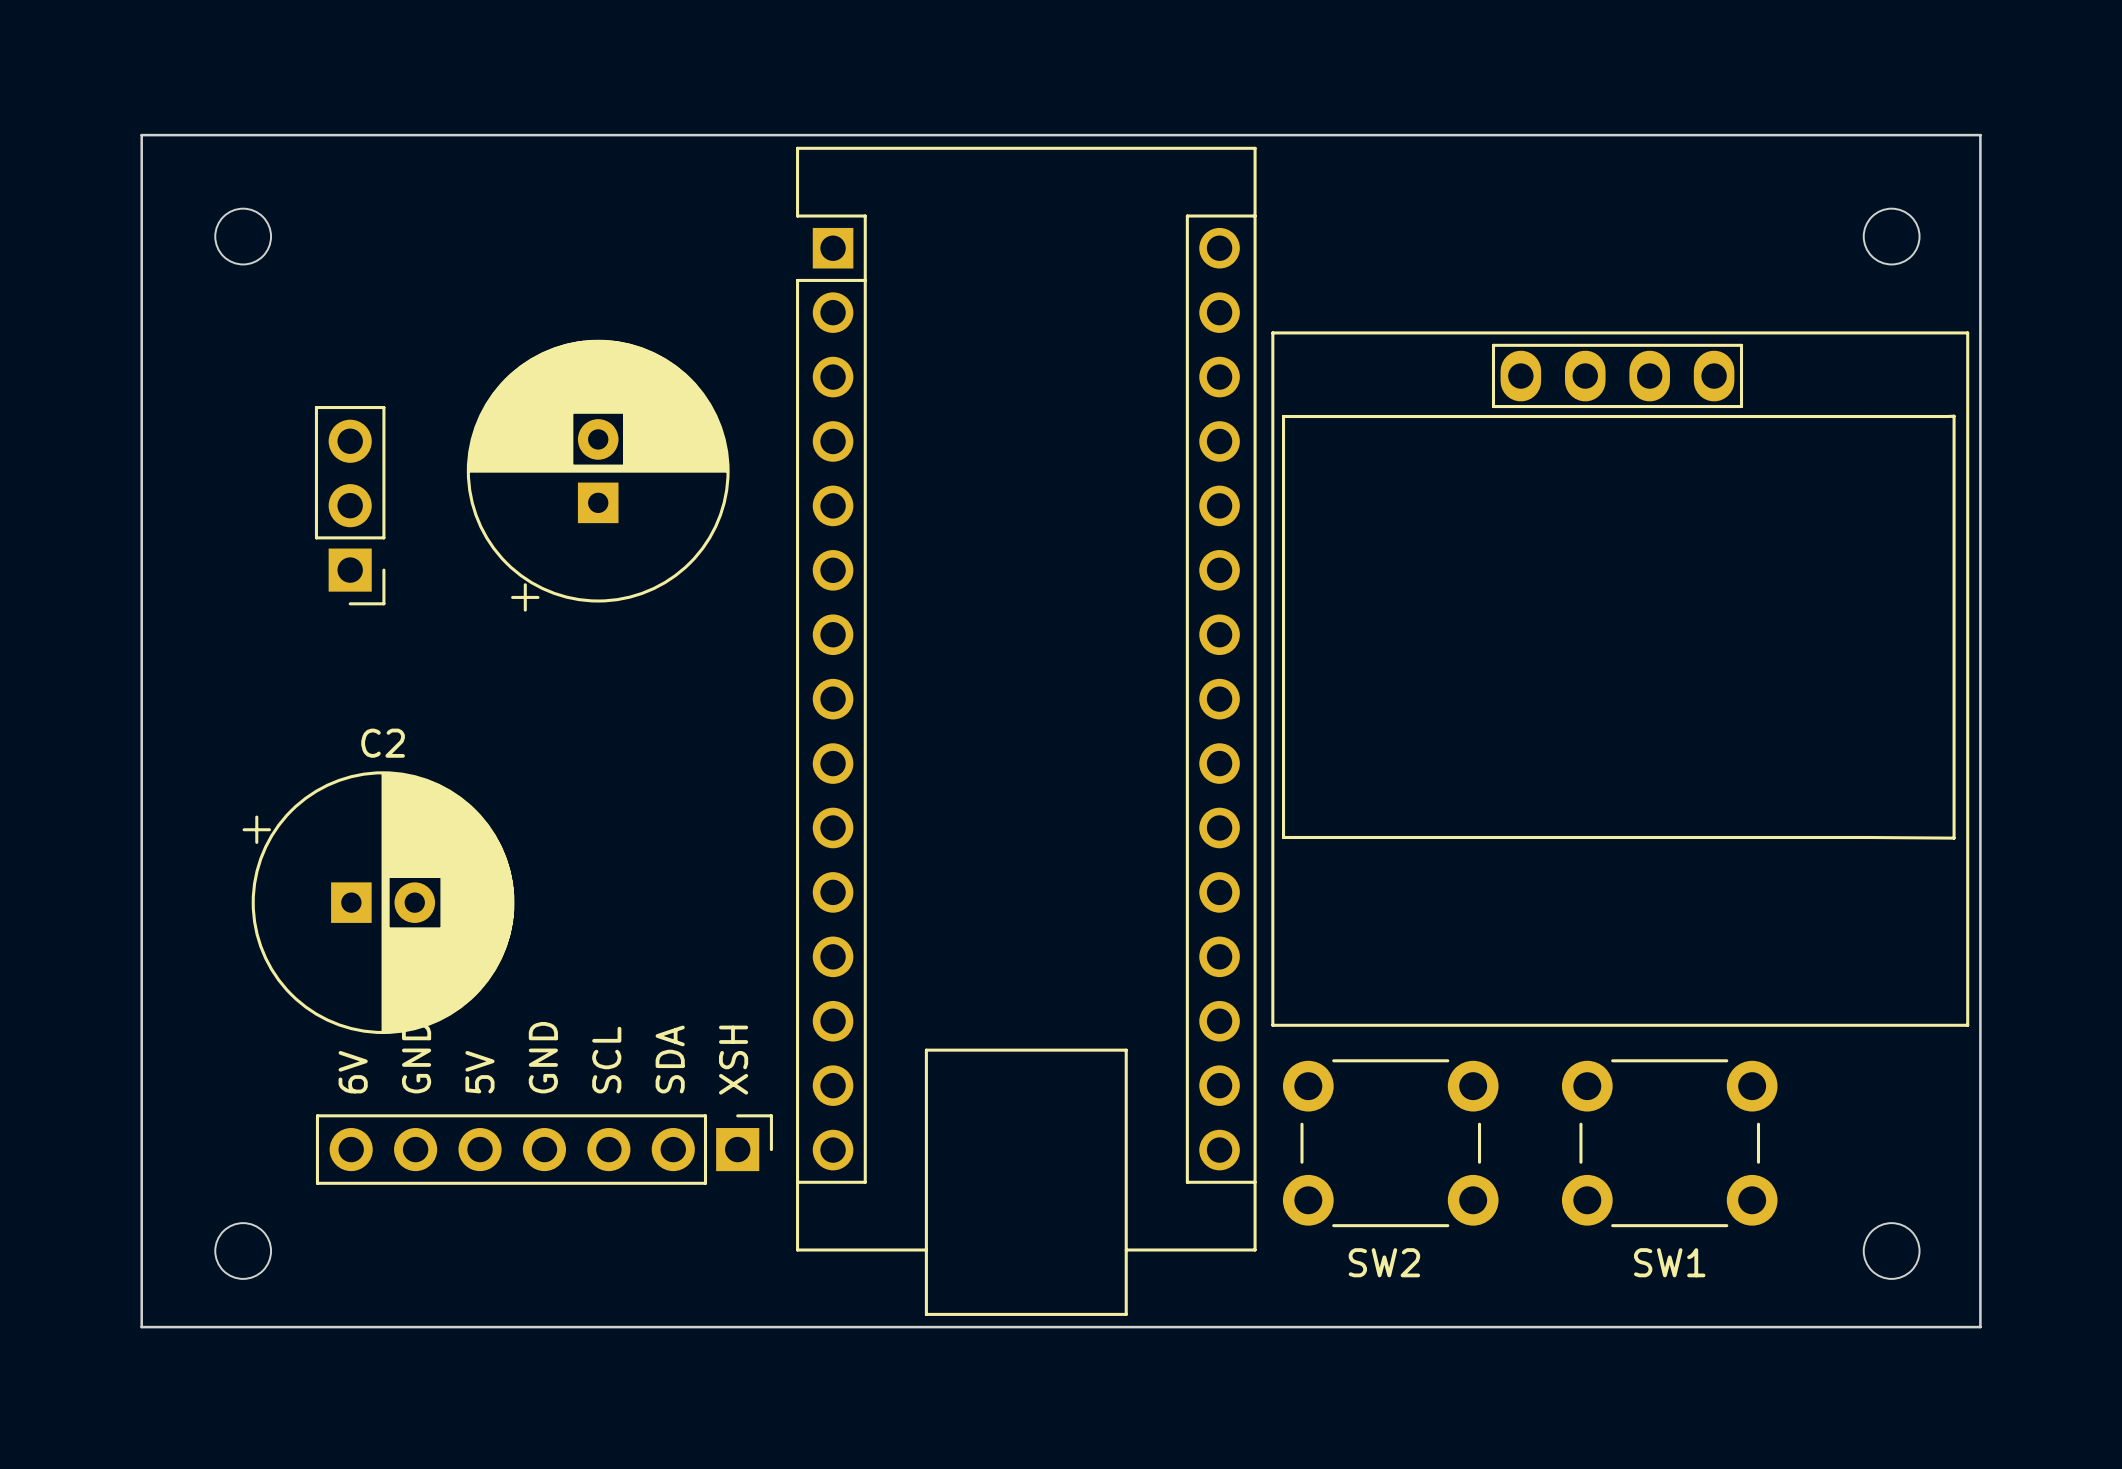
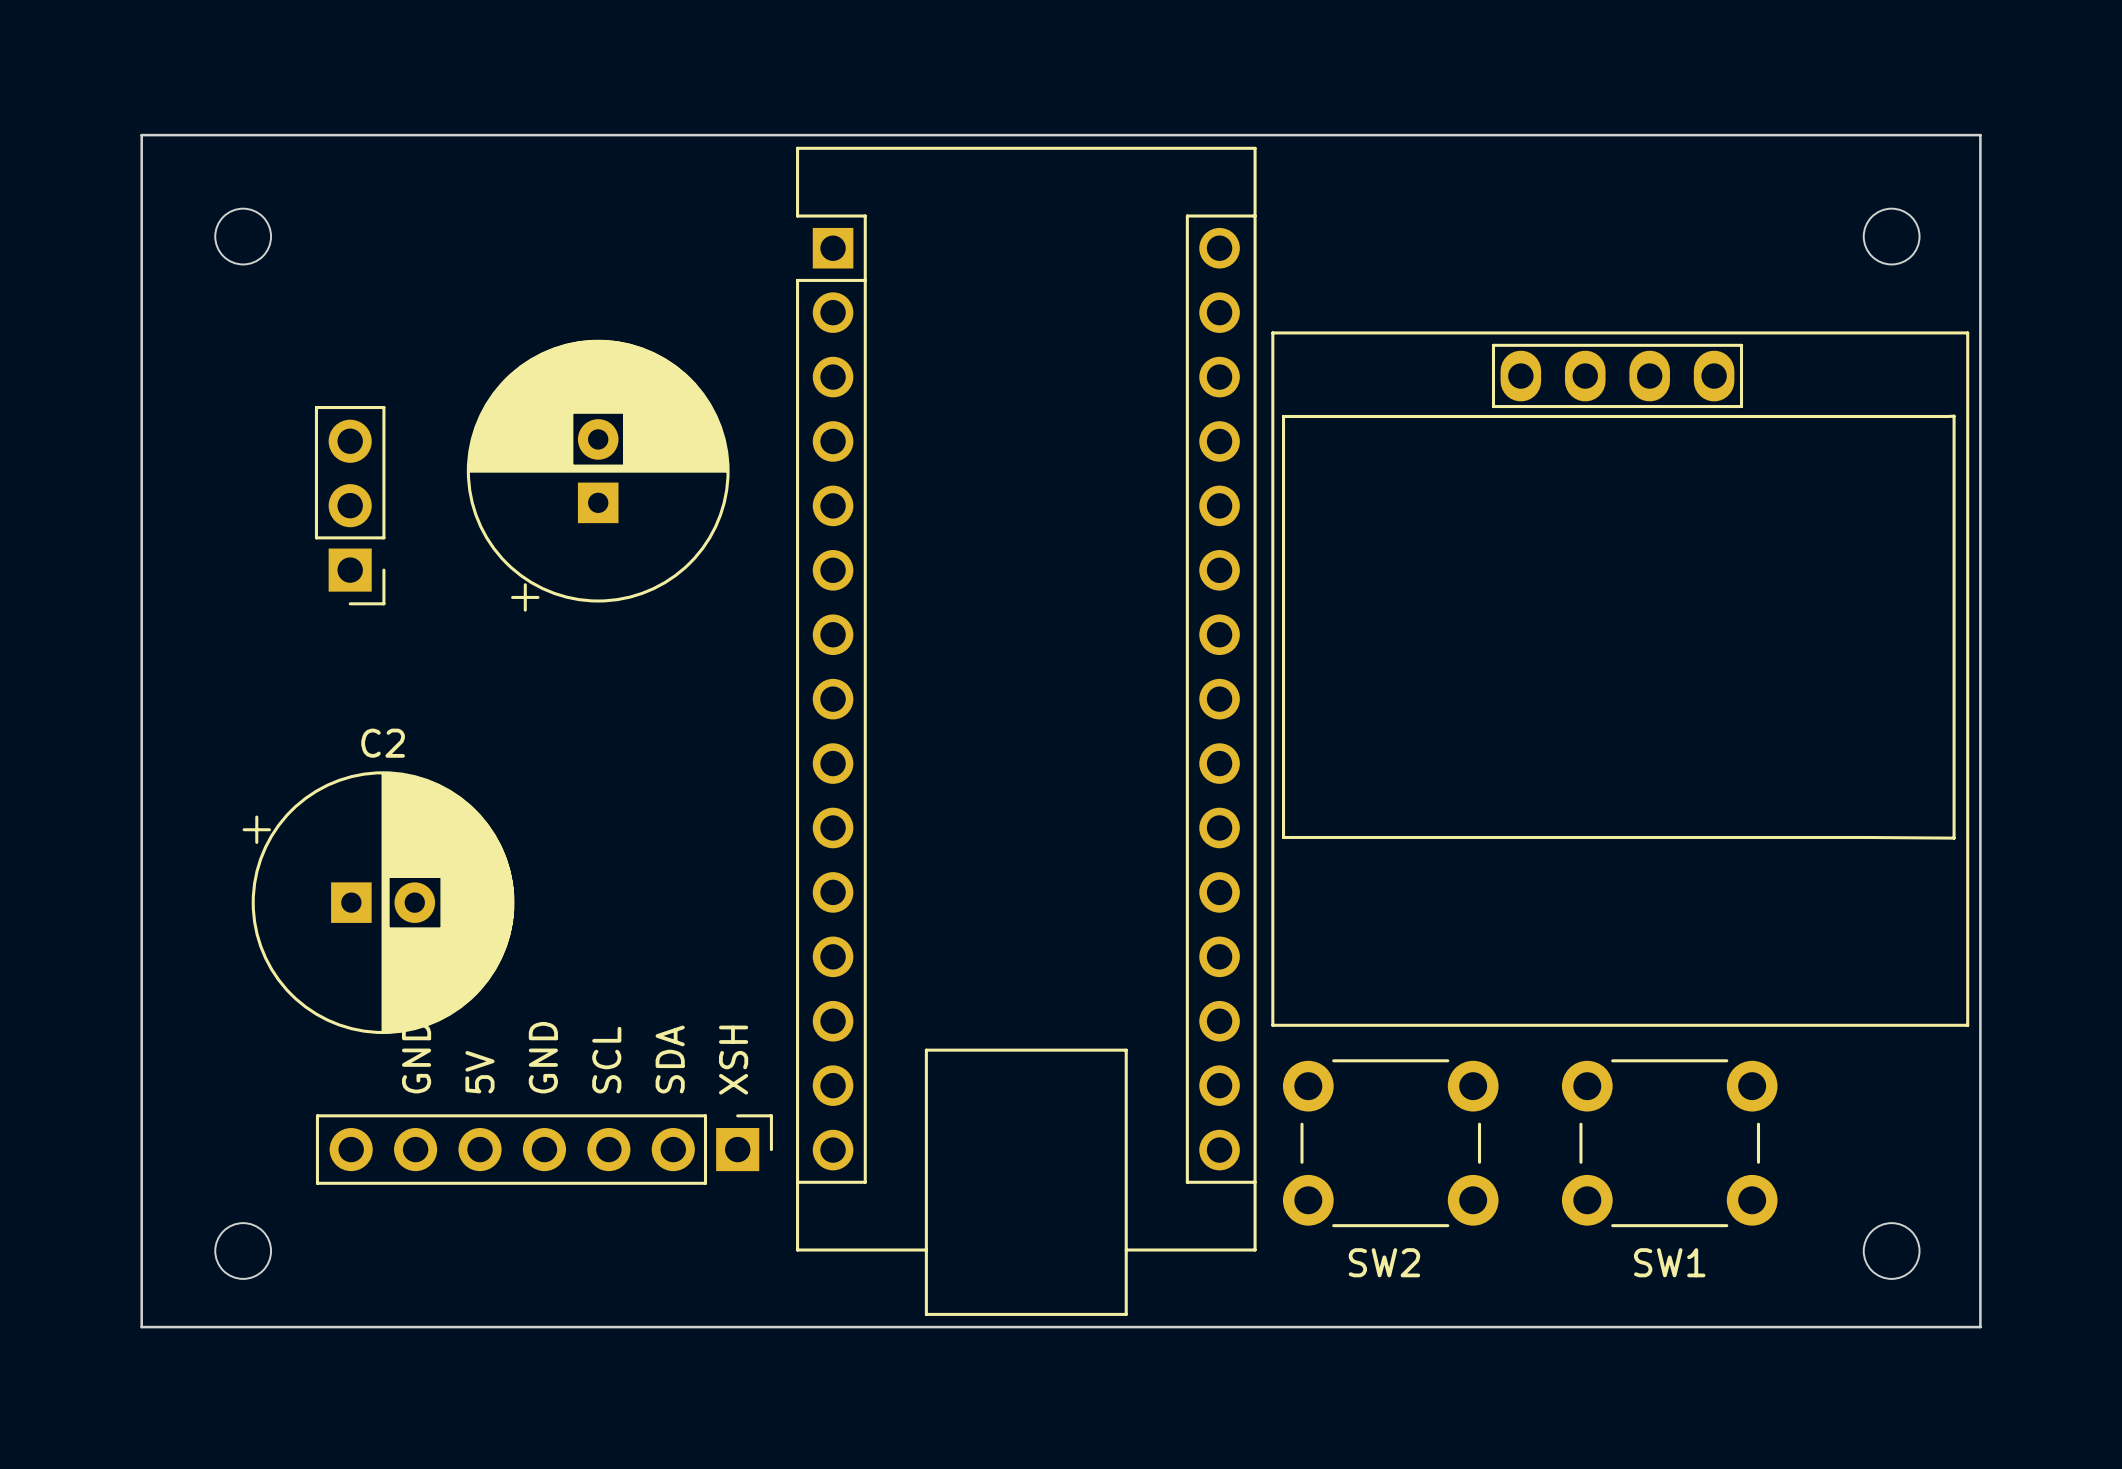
text: 6V (353, 1072) -> none

